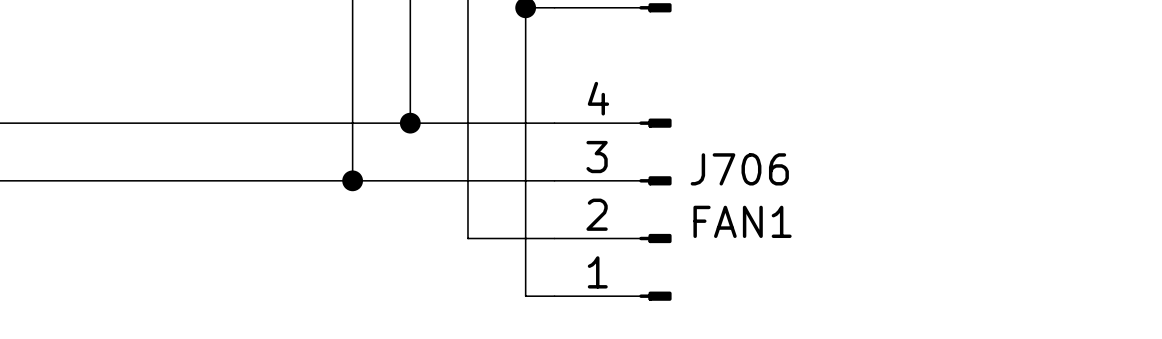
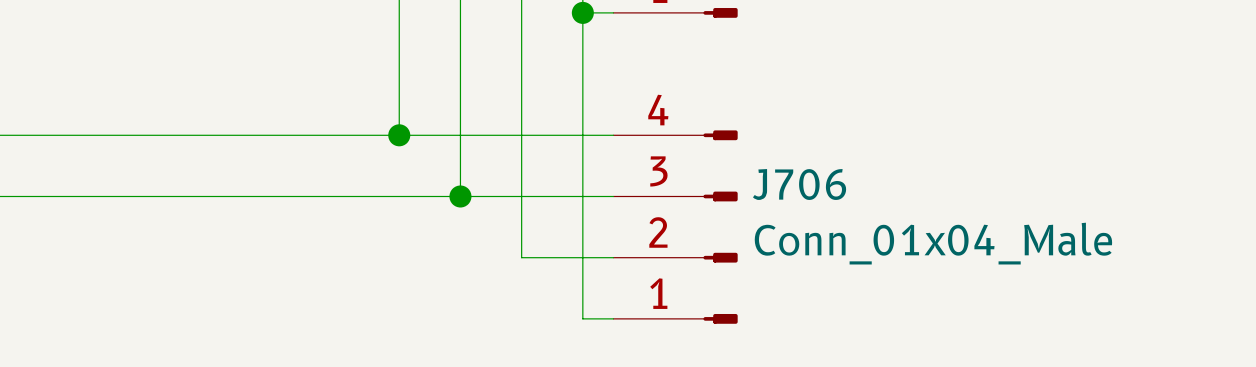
wire: (352, 123) (352, 180) -> (460, 135) (460, 196)
junction: none -> (399, 135)
junction: (410, 123) -> none
junction: (352, 180) -> none
junction: none -> (460, 196)
J706 value: FAN1 (742, 221) -> Conn_01x04_Male (933, 243)

